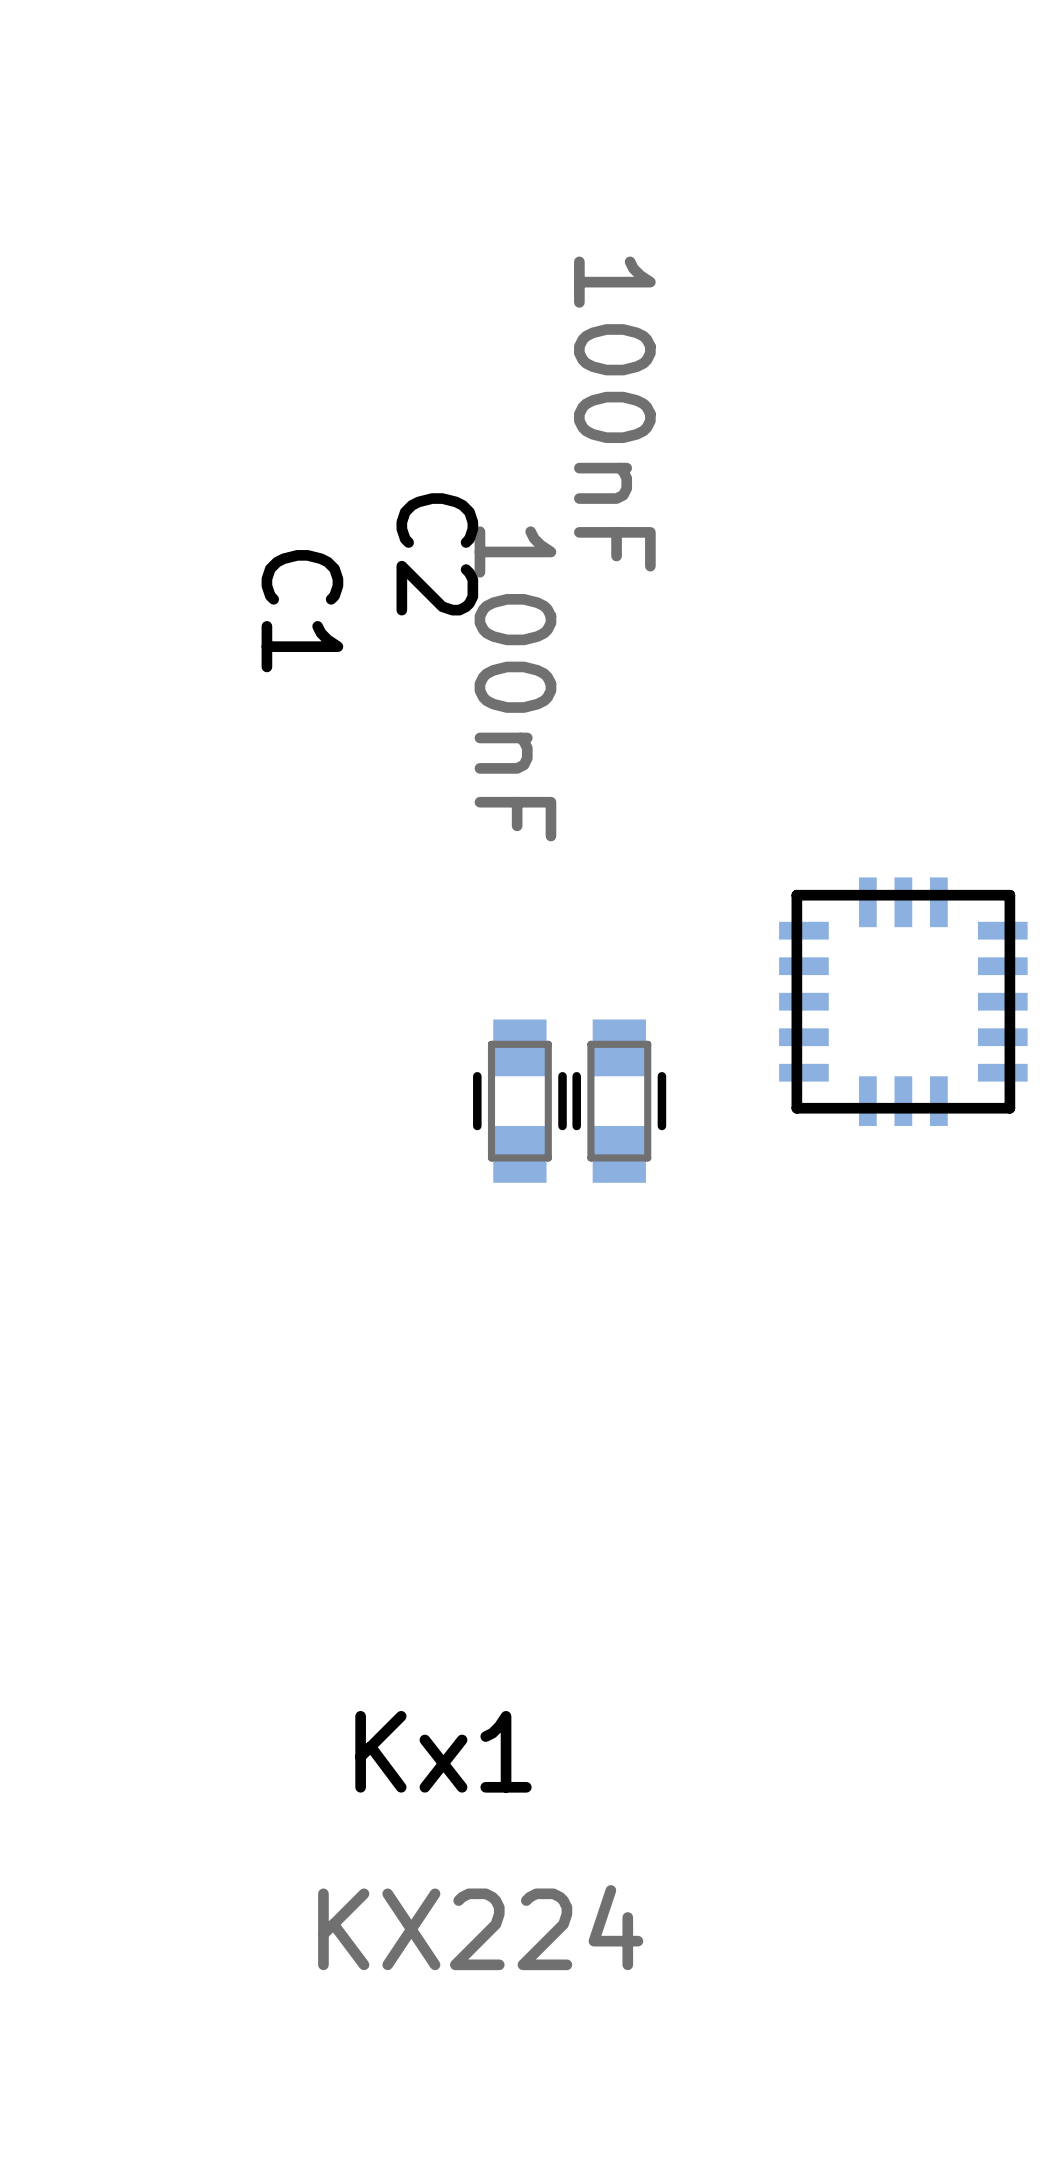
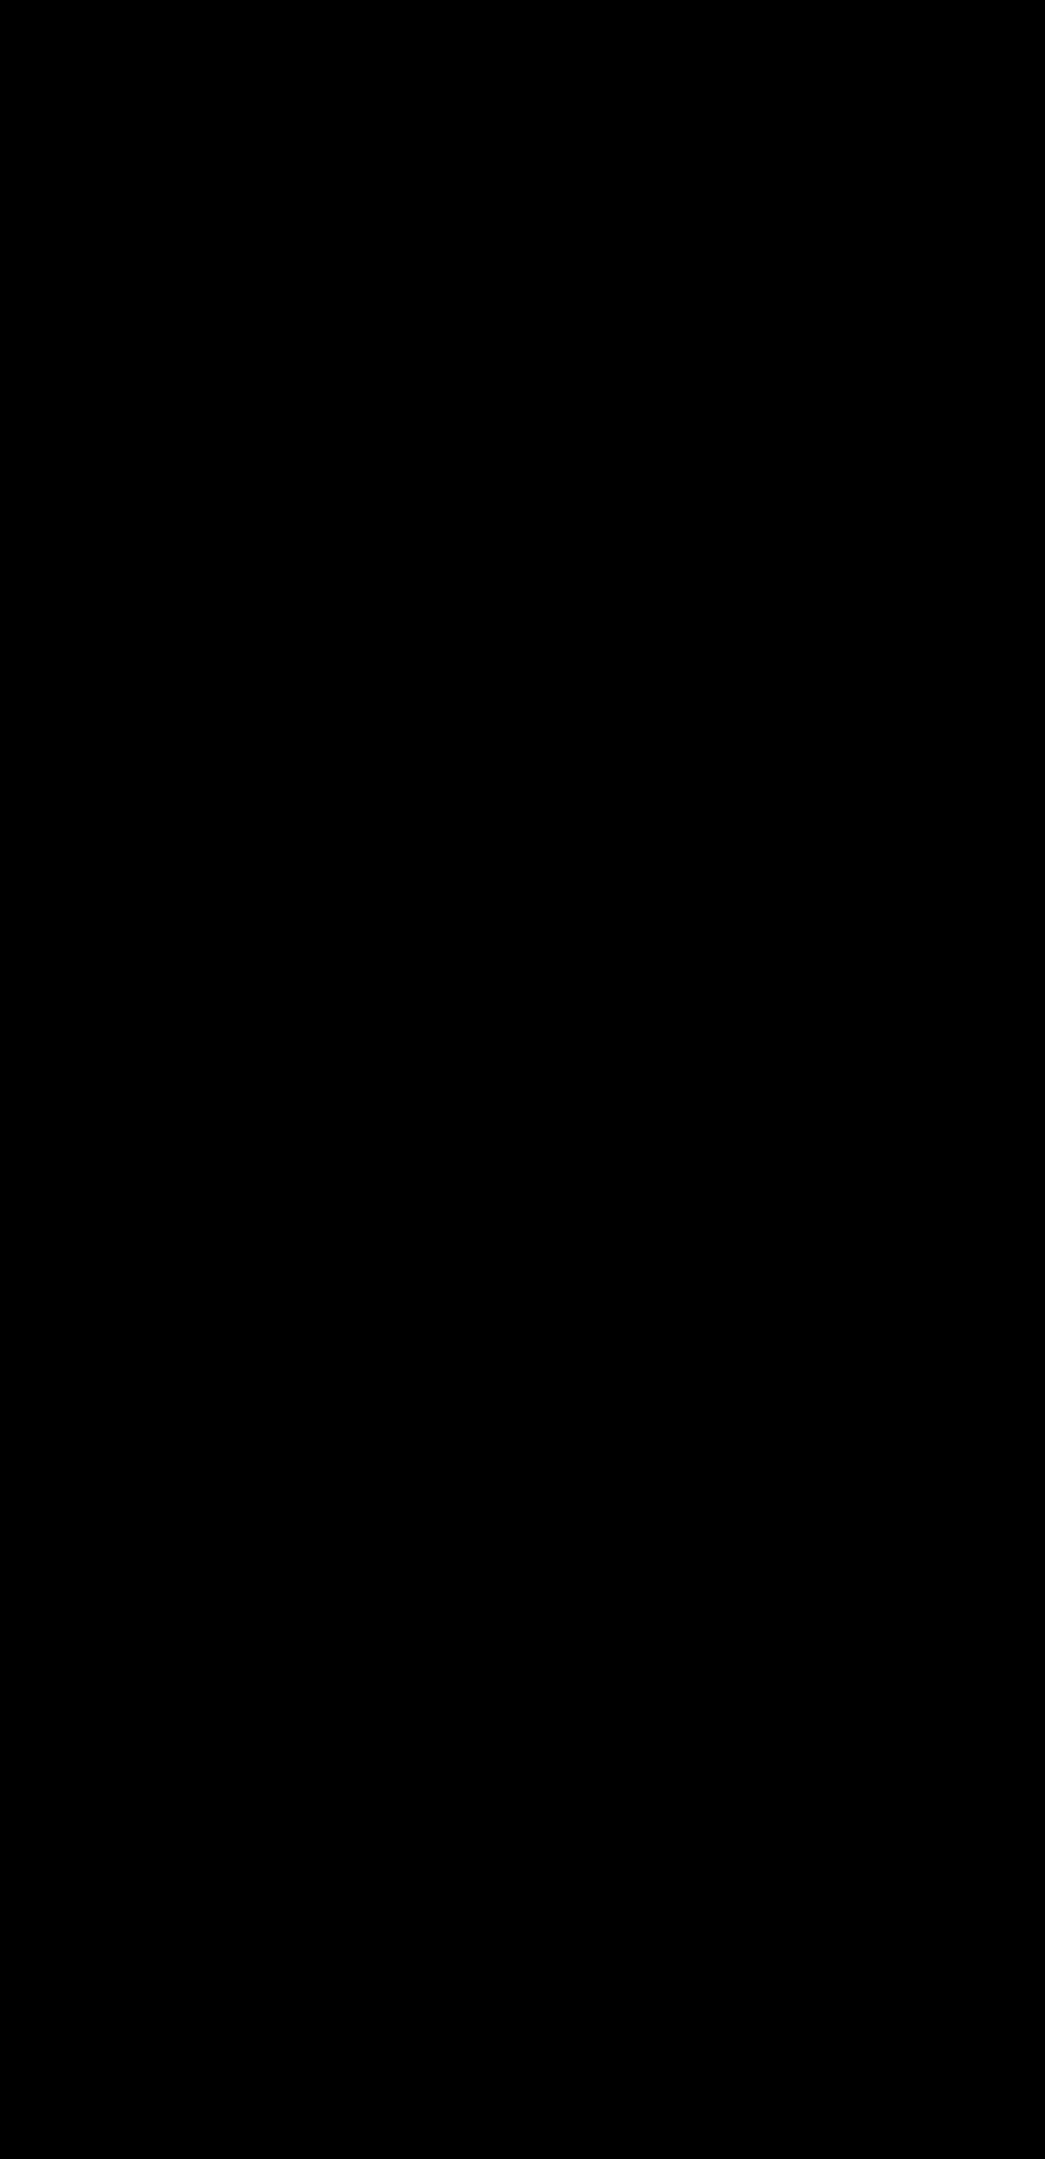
Kx1: KX224 (903, 1001) -> none
C1: 100nF (519, 1101) -> none
C2: 100nF (619, 1101) -> none

